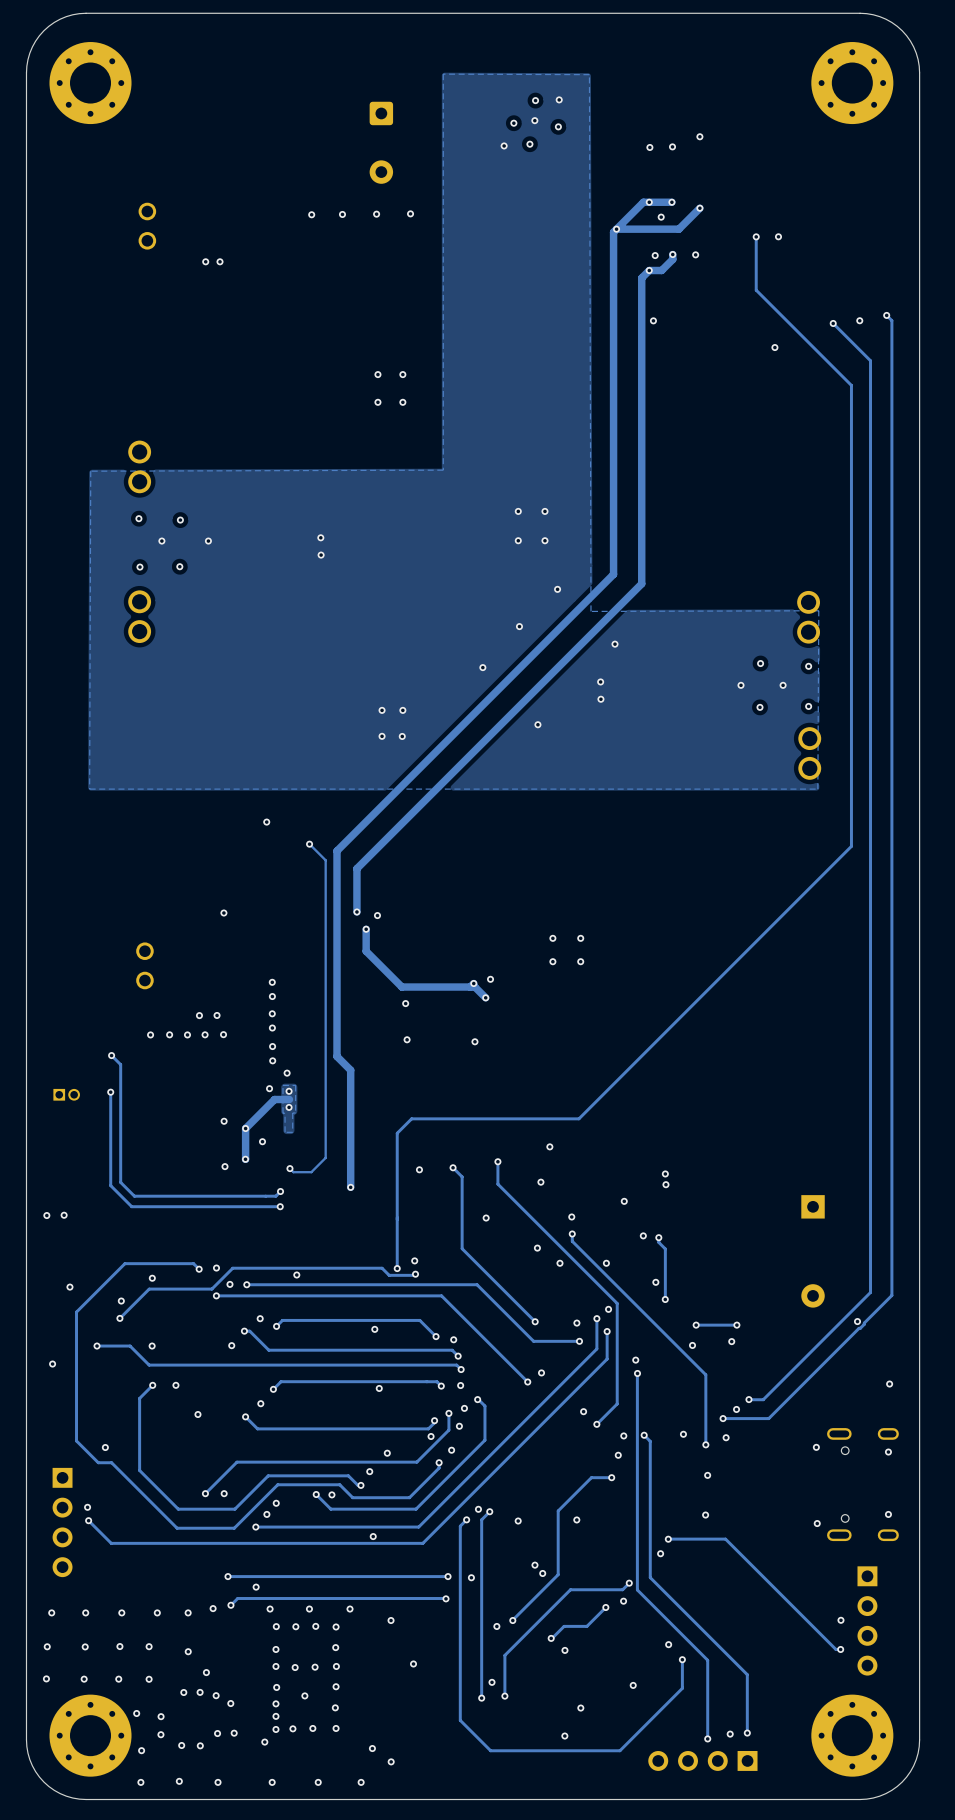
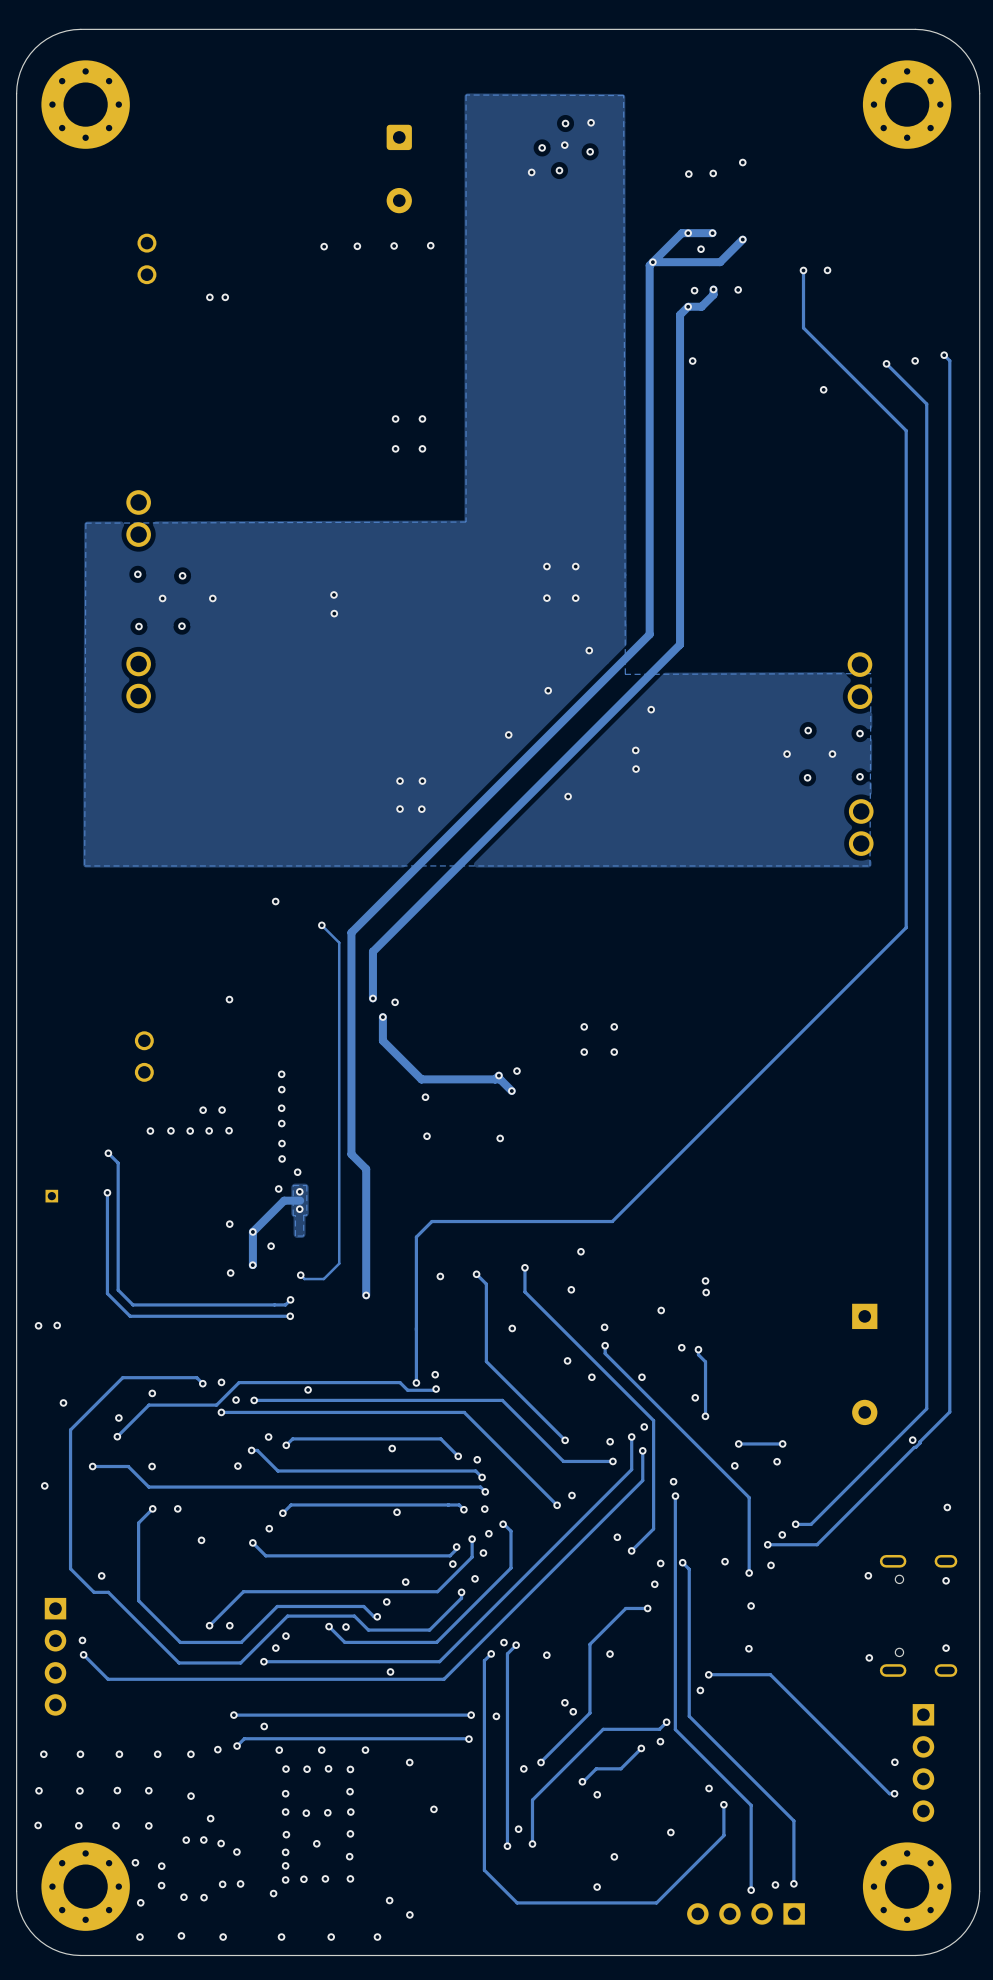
part footprint: [53, 1088, 80, 1101] -> [45, 1189, 59, 1203]

